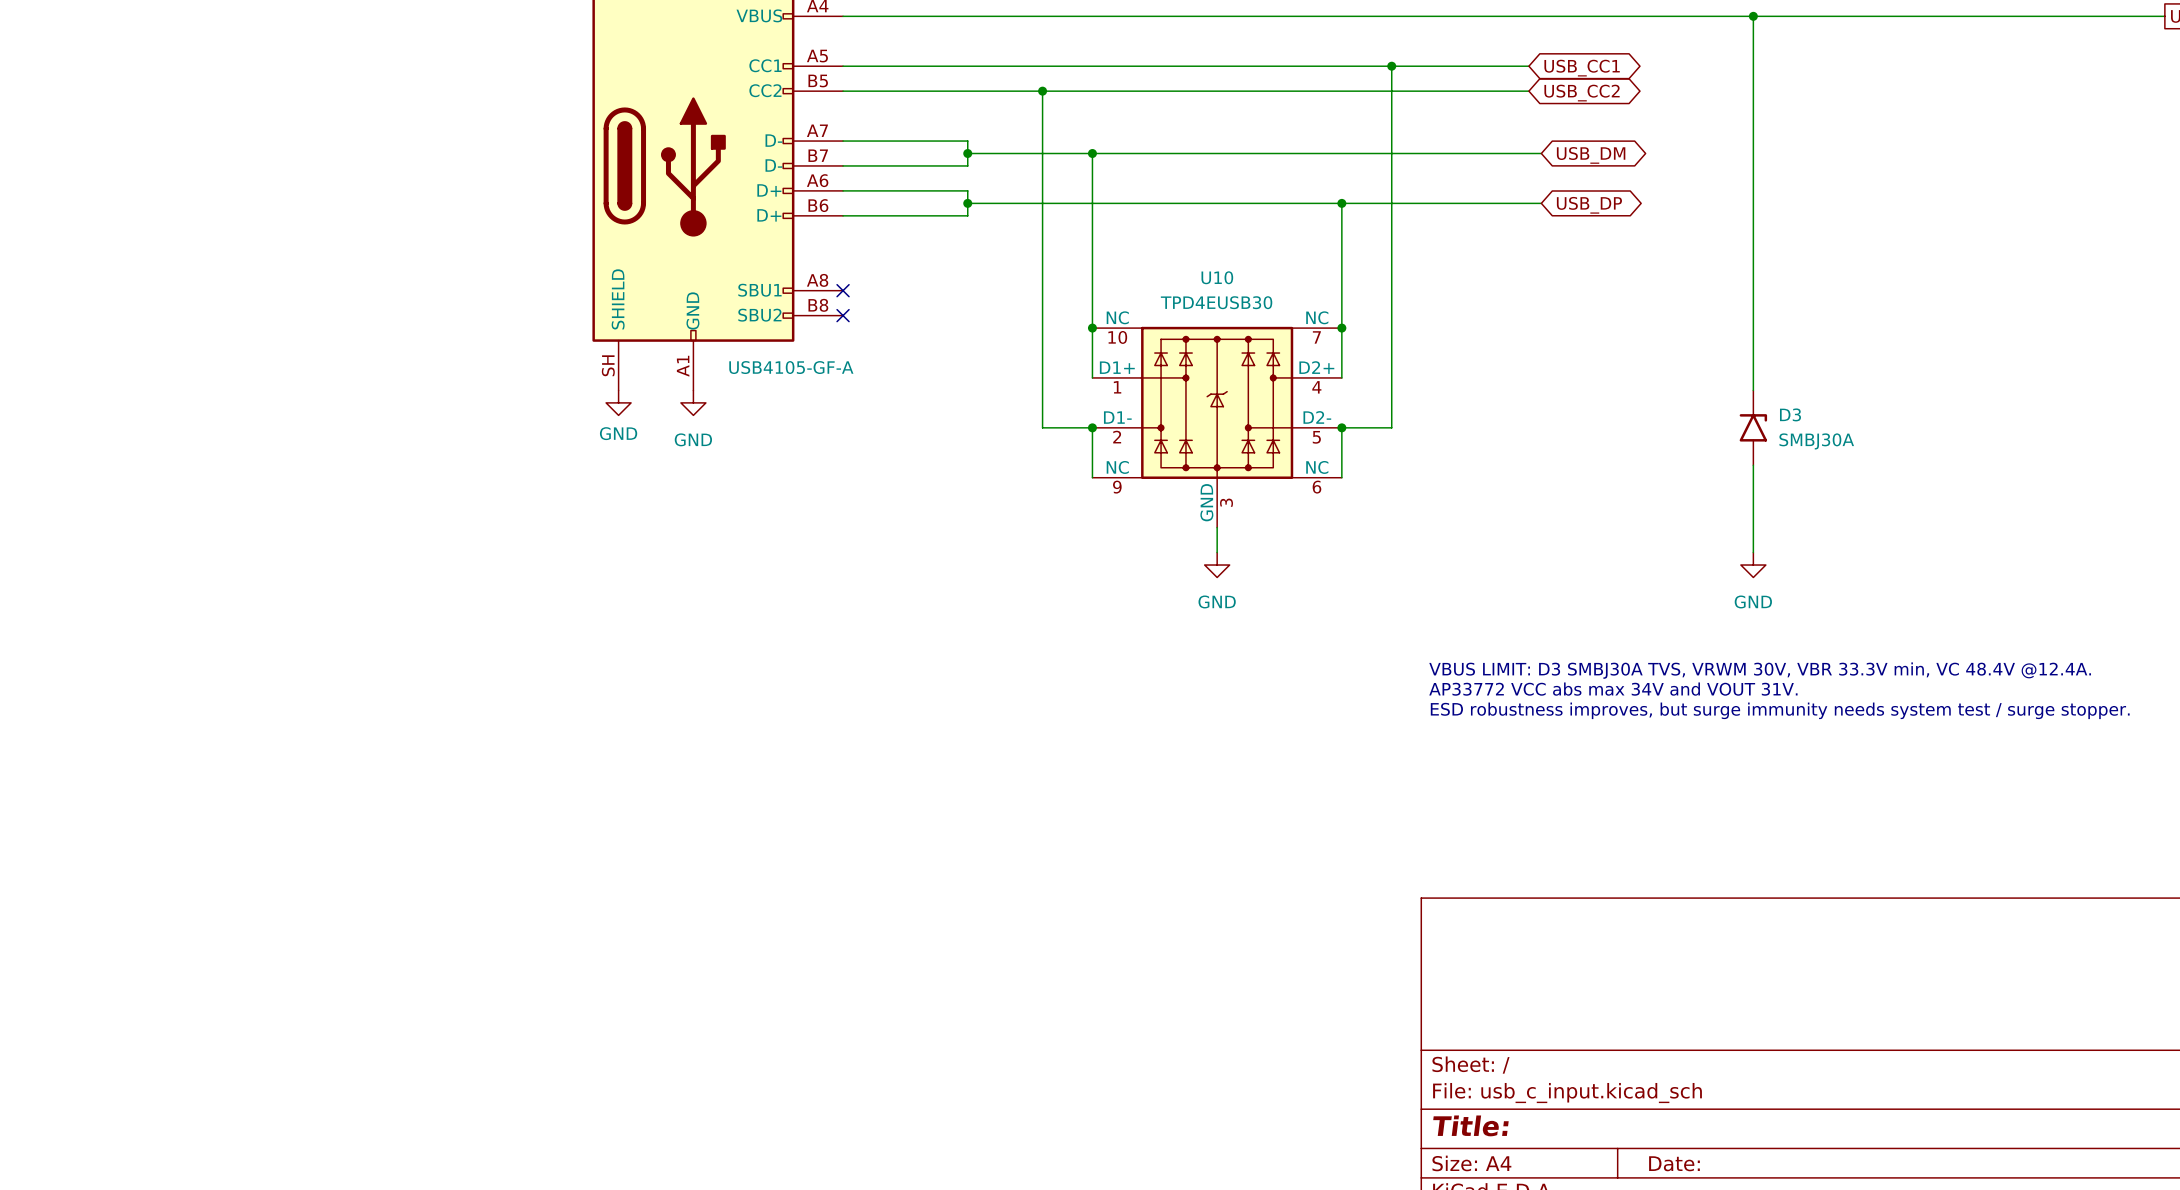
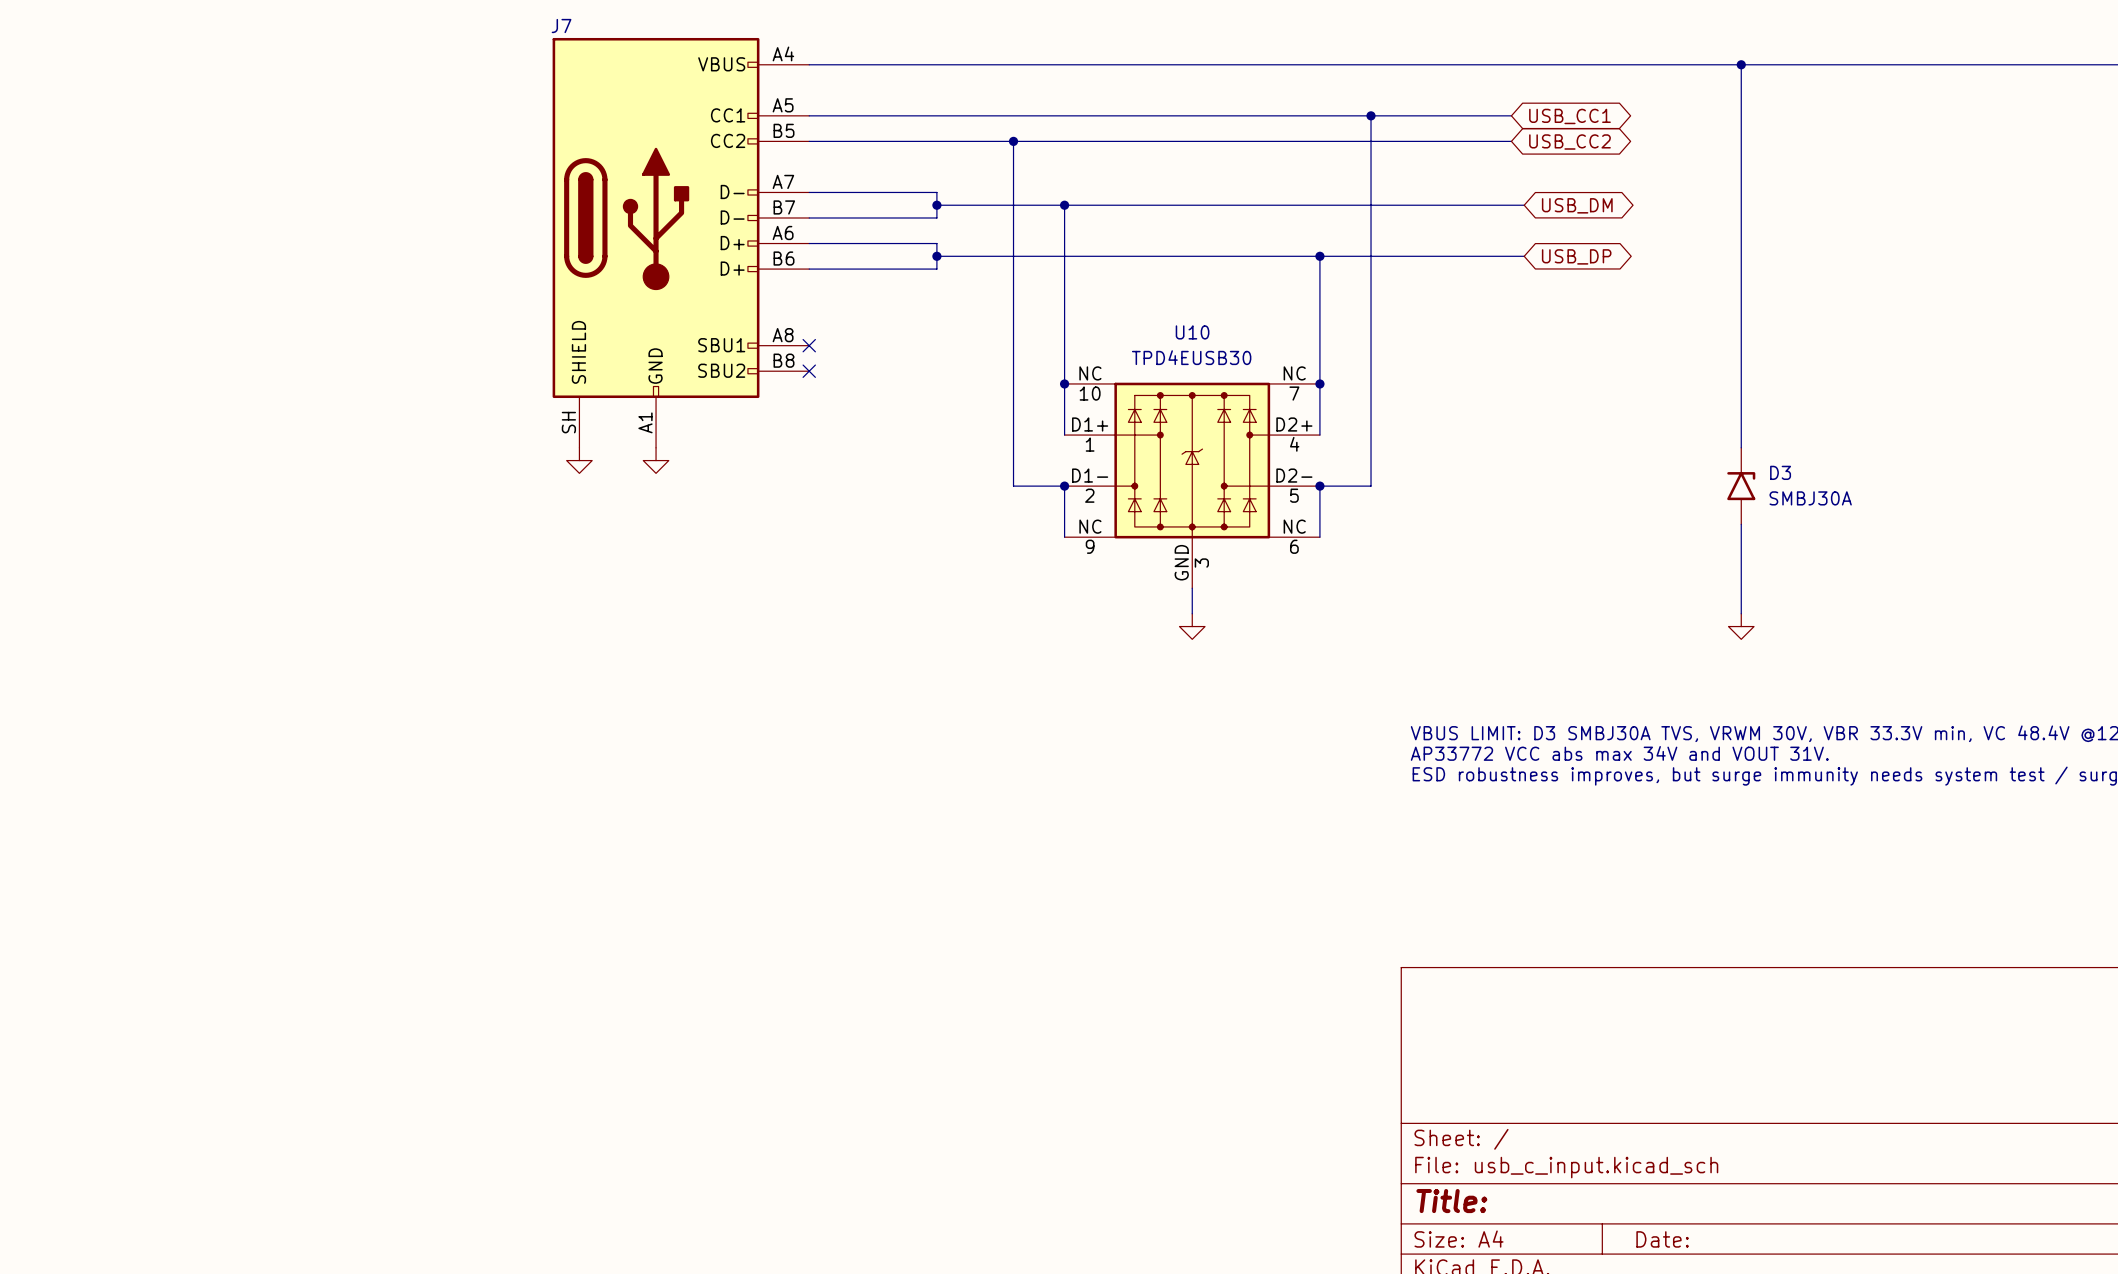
J7 text: USB4105-GF-A (791, 367) -> none
power symbol text: GND (618, 433) -> none
power symbol text: GND (693, 439) -> none
power symbol text: GND (1217, 601) -> none
power symbol text: GND (1753, 601) -> none

